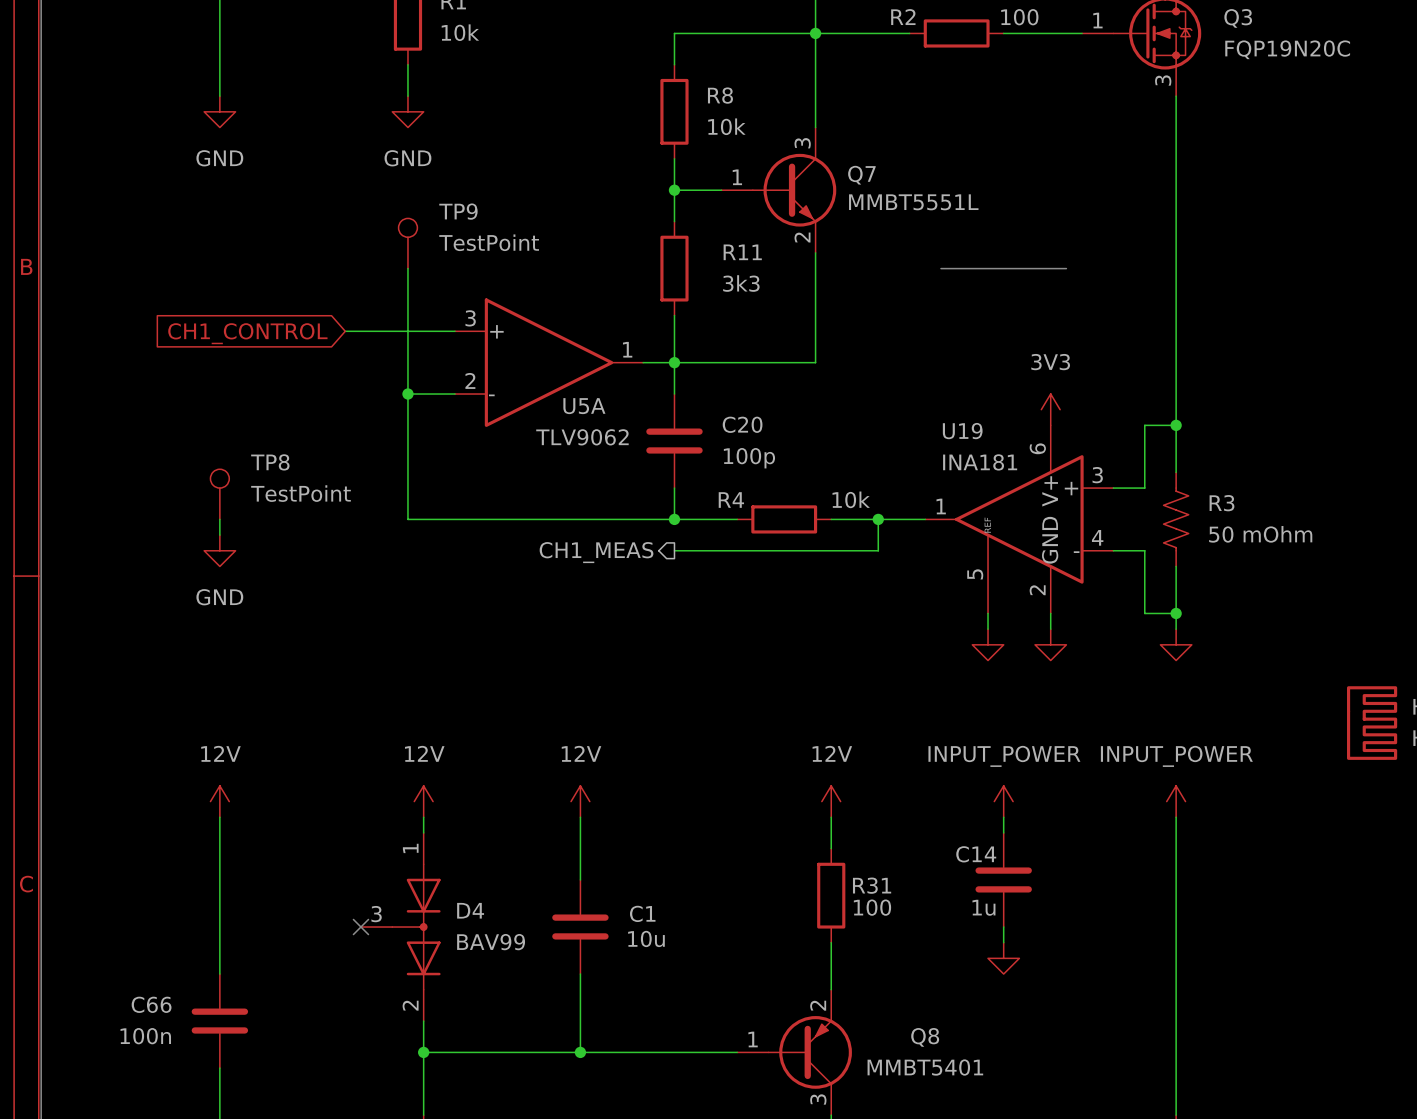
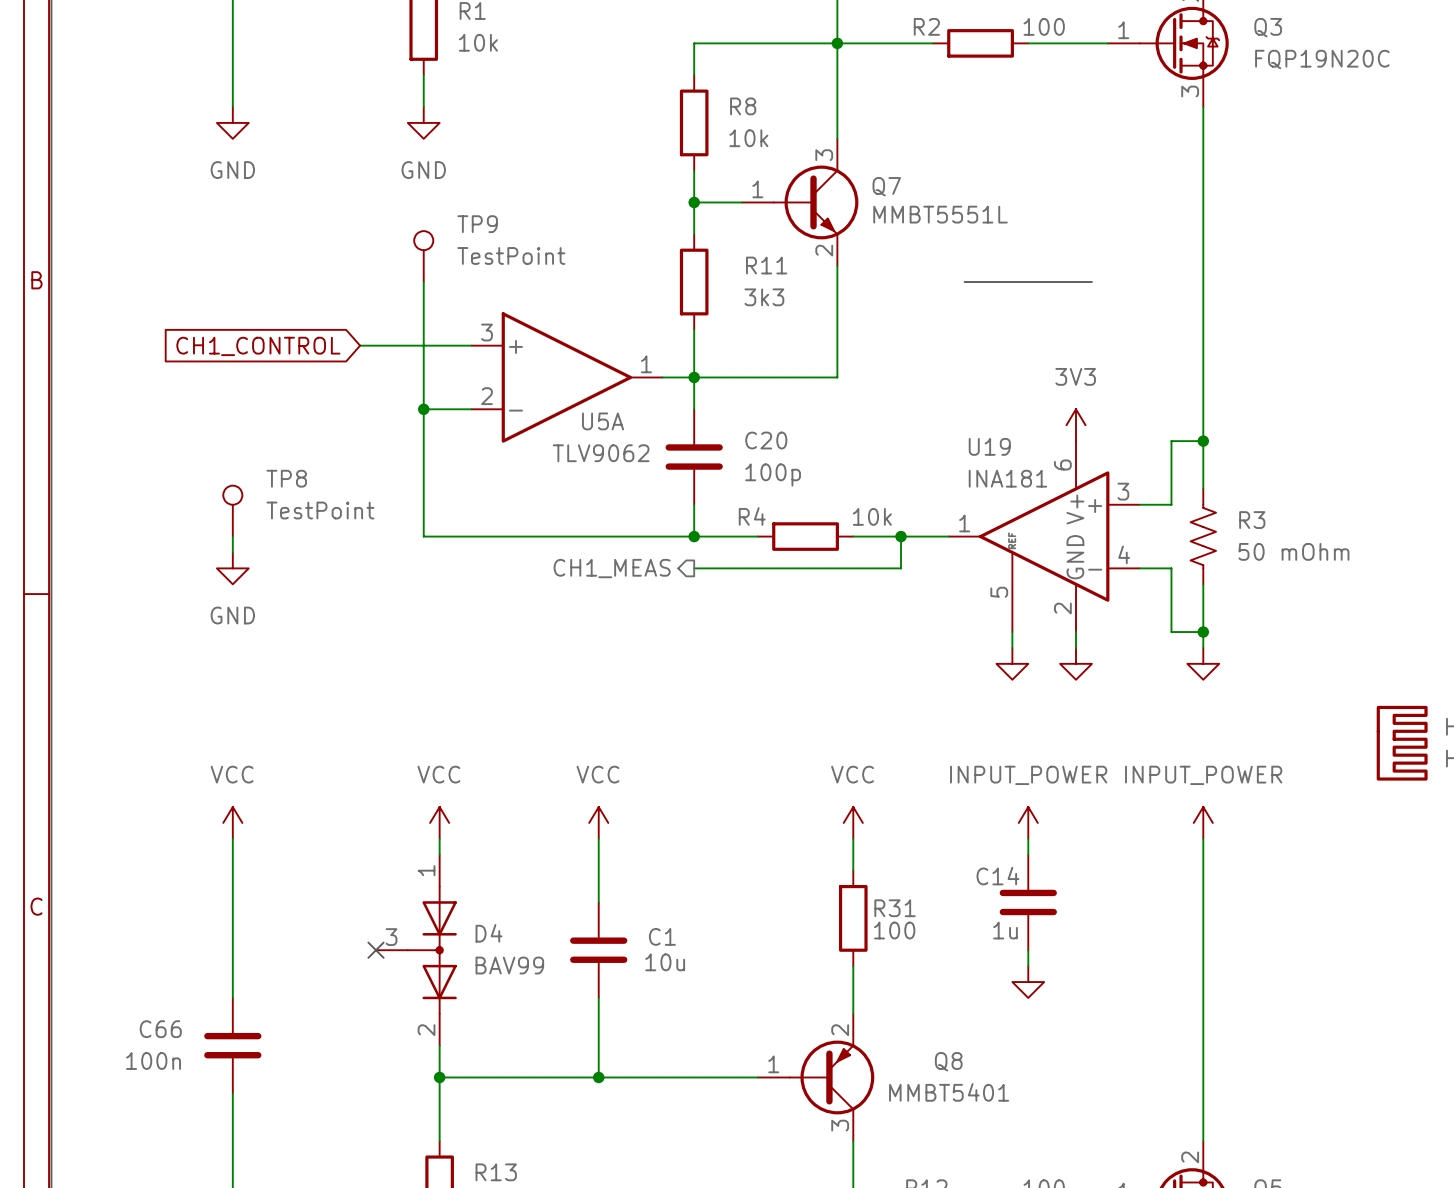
power symbol: 12V (219, 801) -> VCC (232, 822)
power symbol: 12V (423, 801) -> VCC (439, 822)
power symbol: 12V (580, 801) -> VCC (598, 822)
power symbol: 12V (831, 801) -> VCC (853, 822)

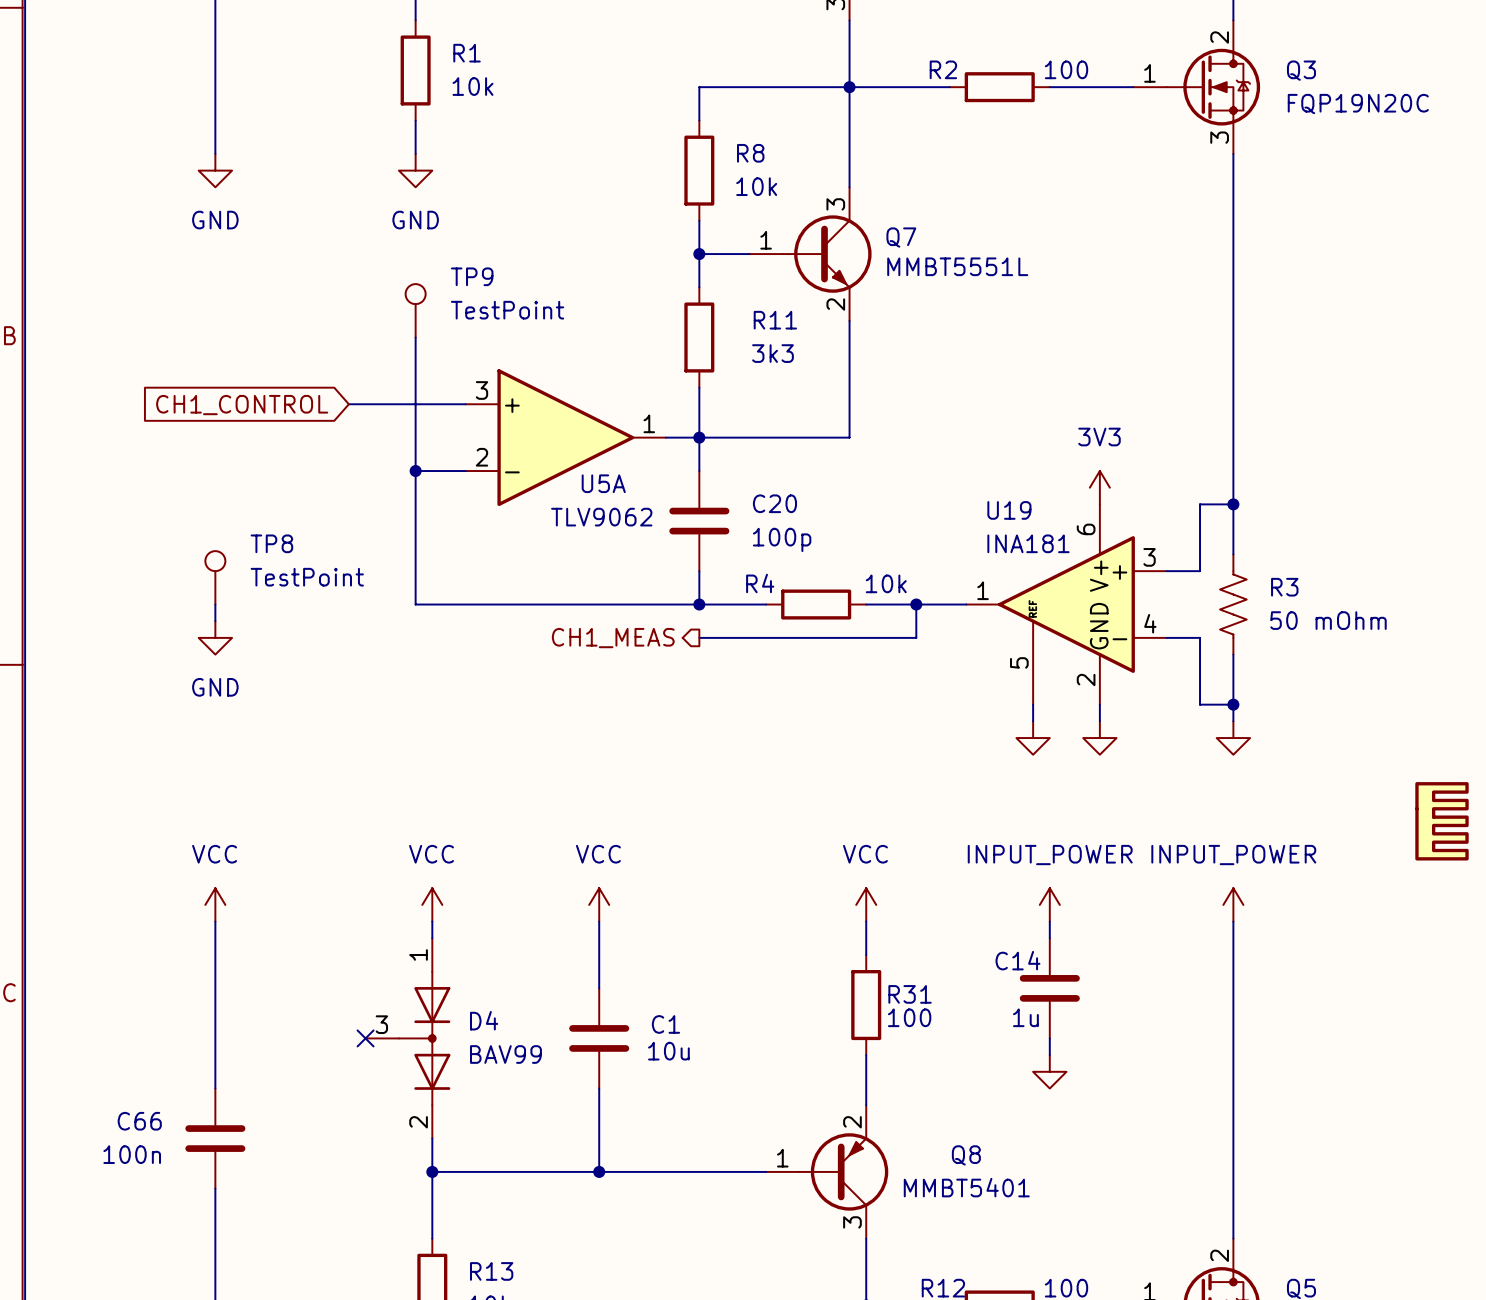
line: (964, 282) (1091, 282) -> none

